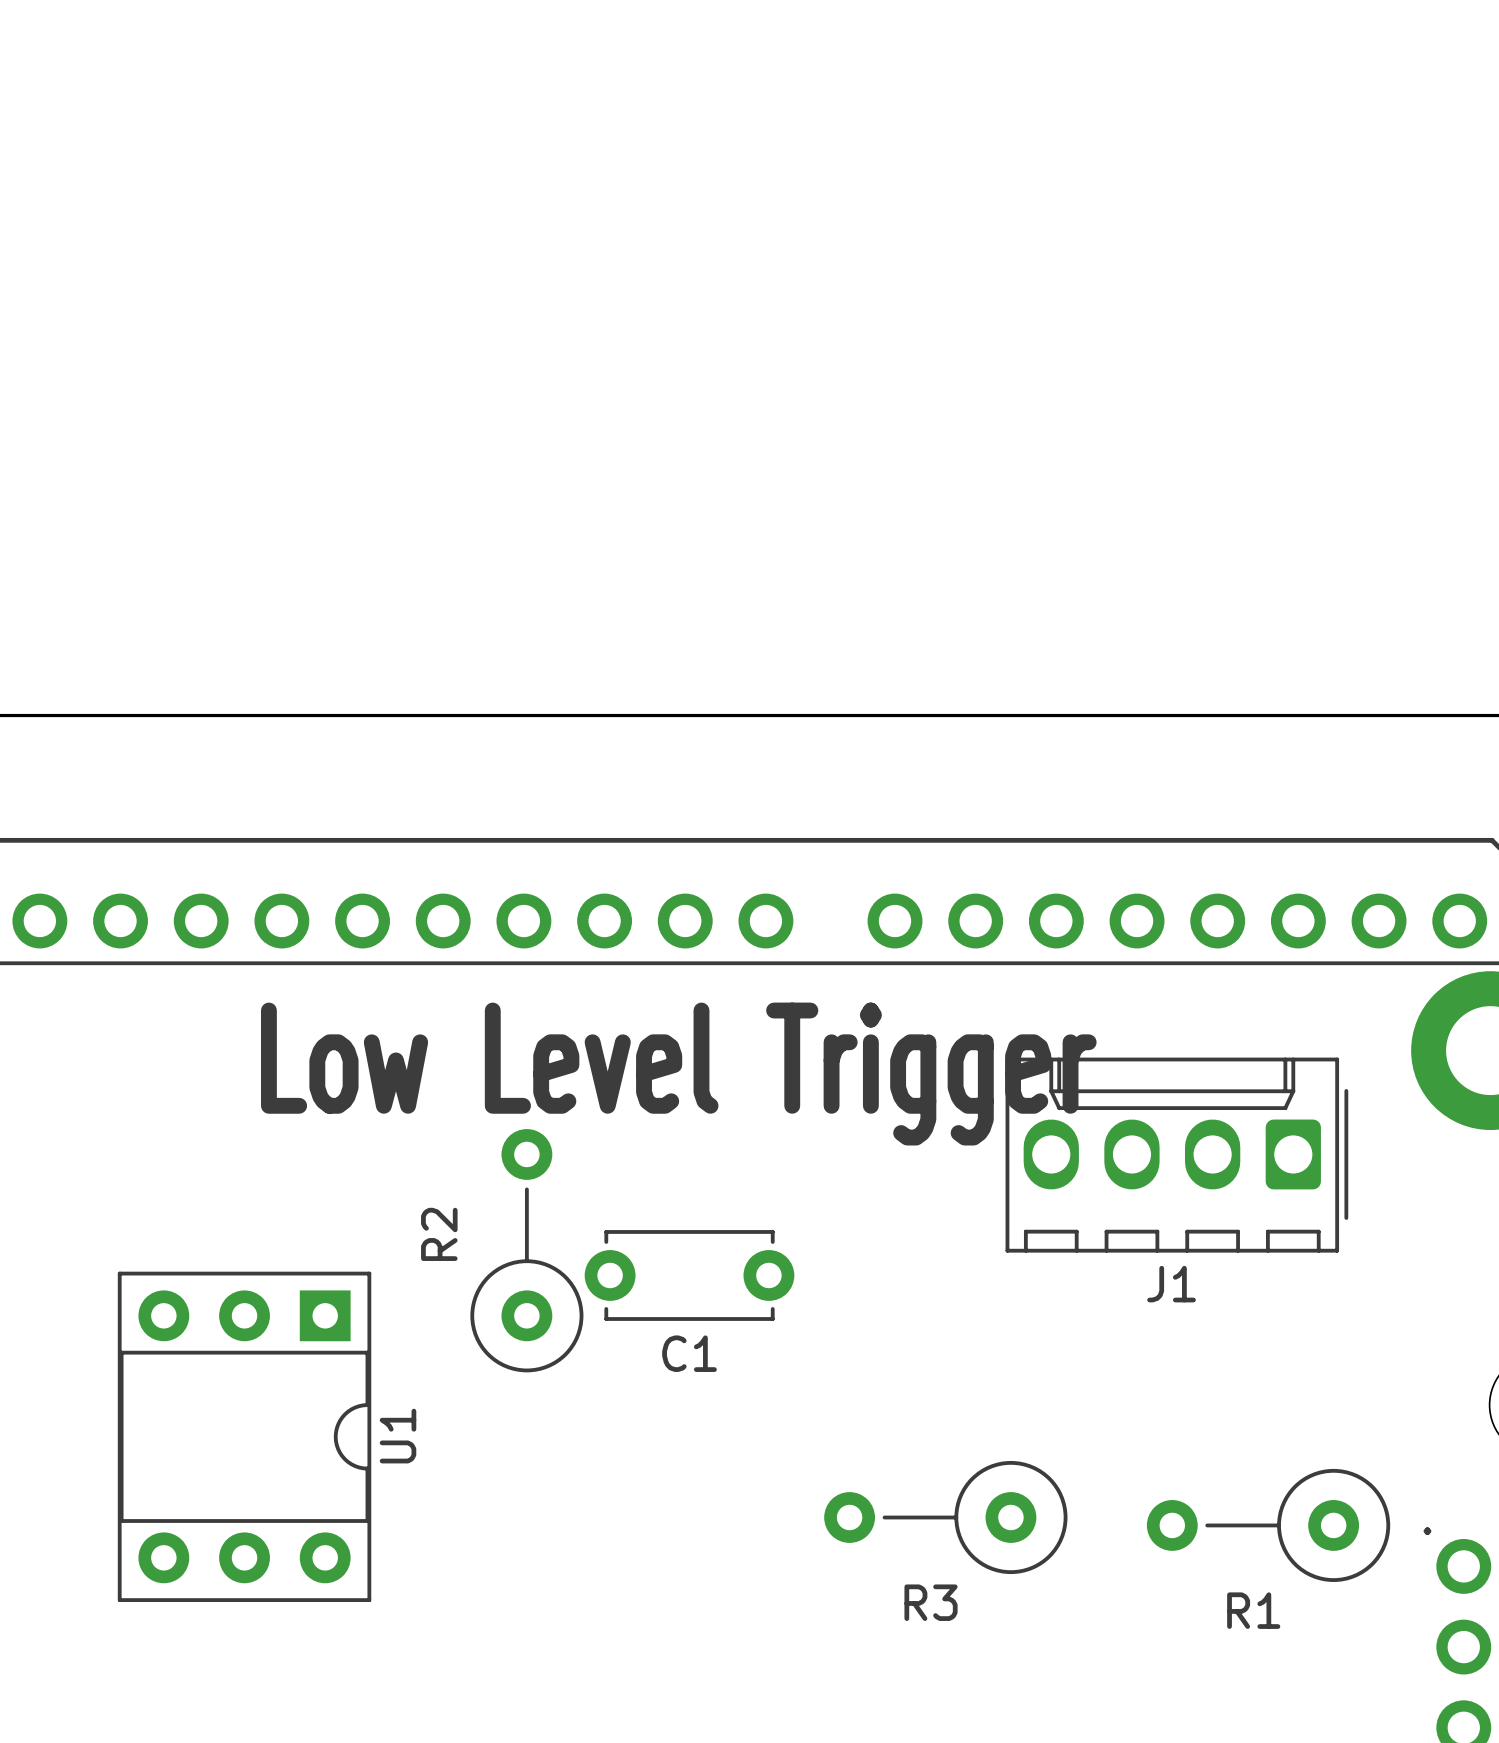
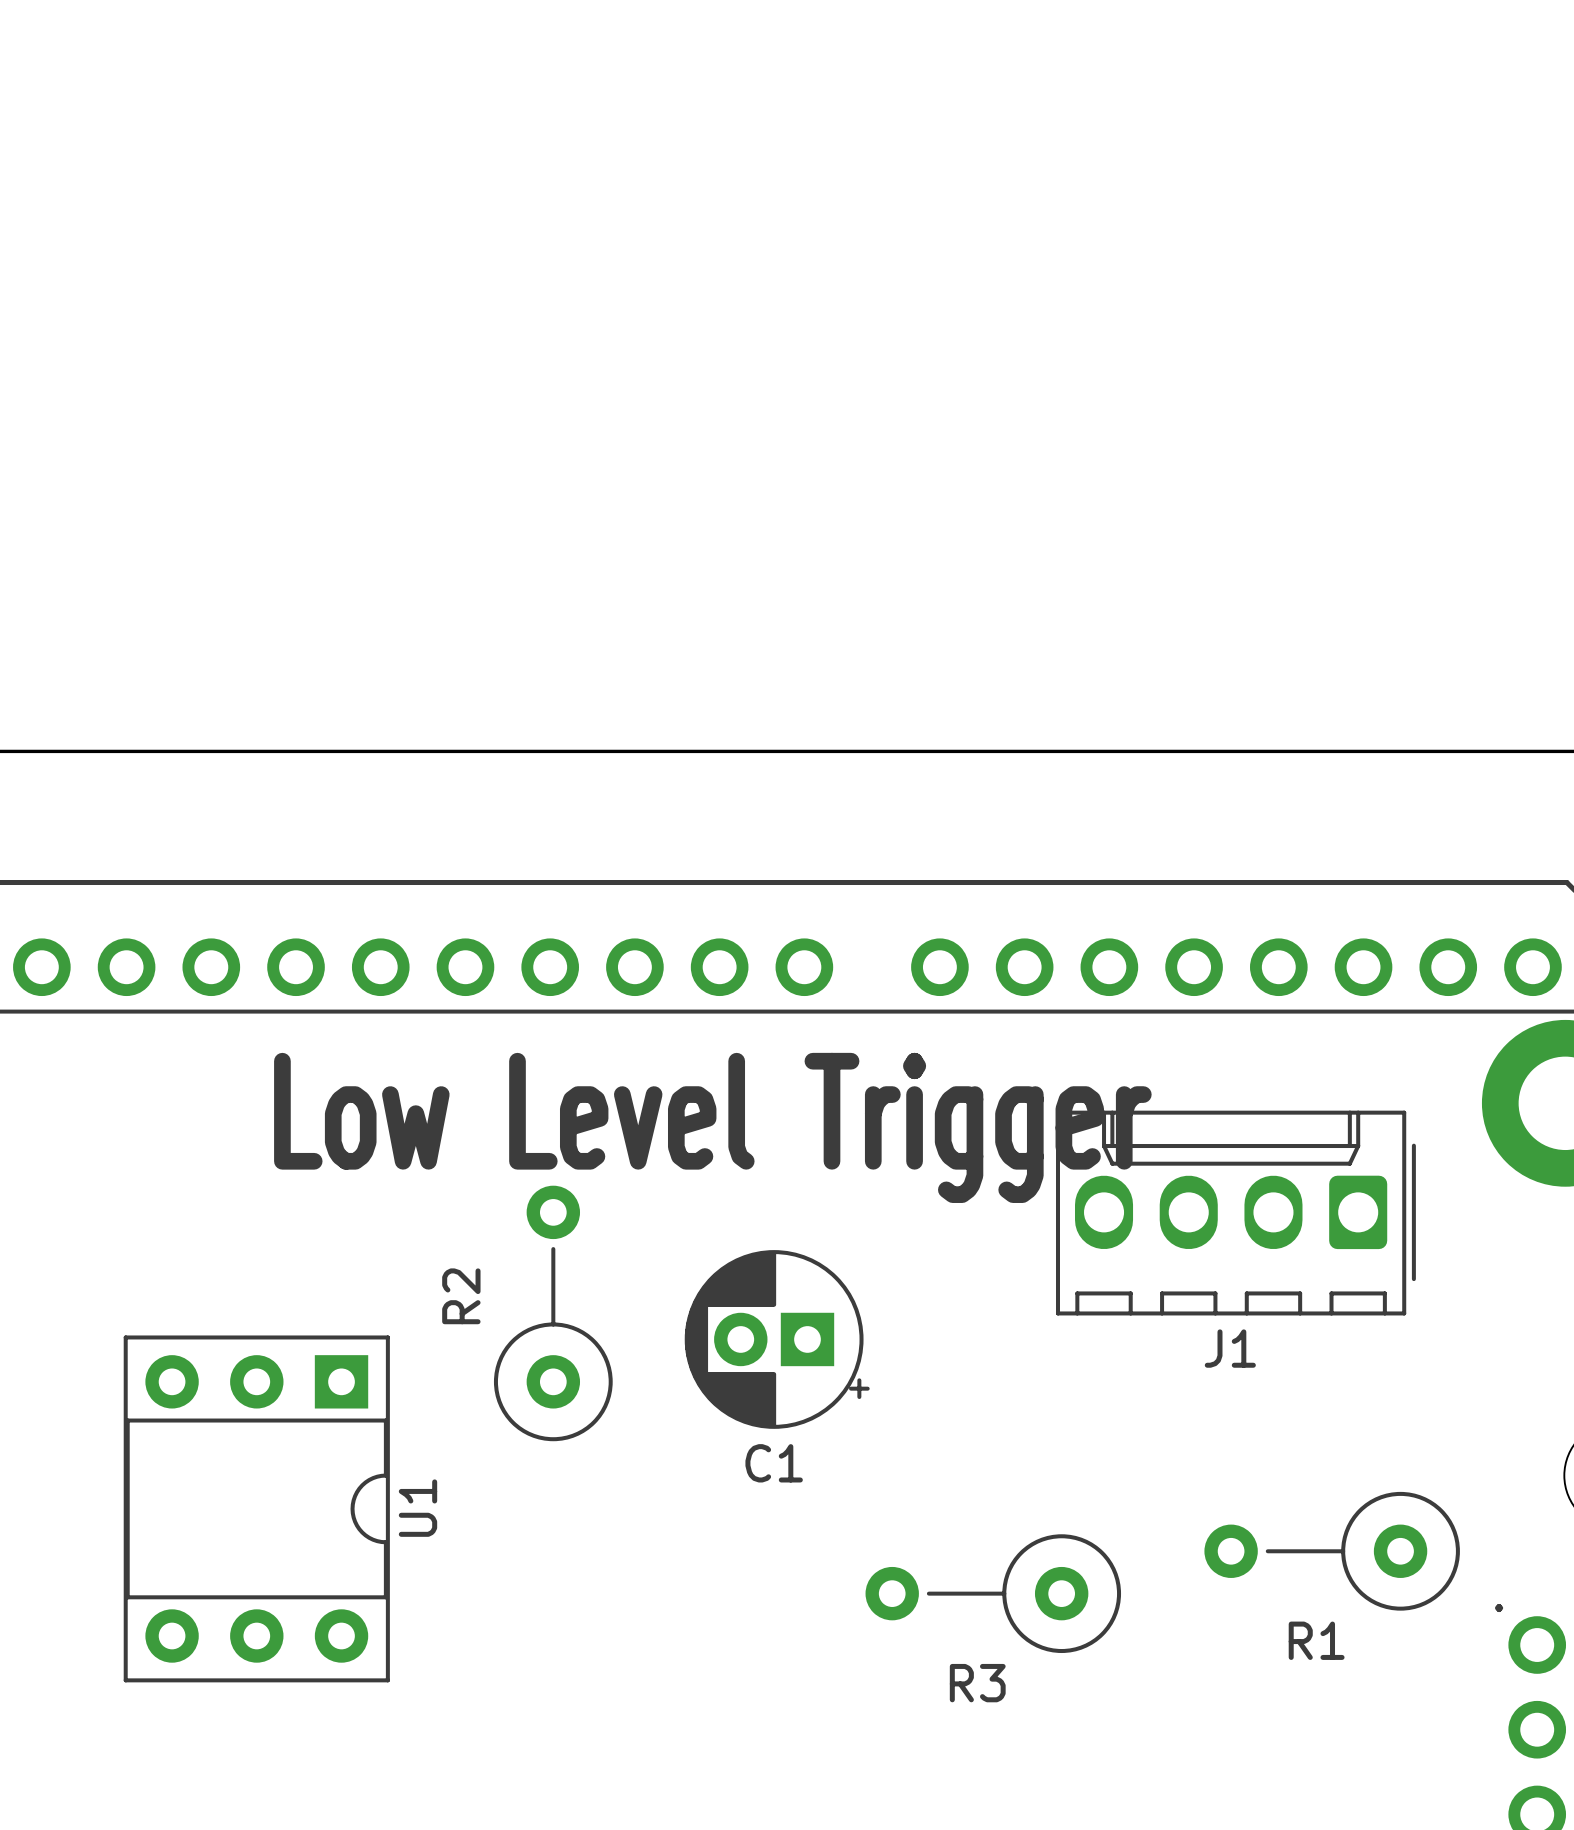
C1 footprint: [584, 1230, 795, 1321] -> [684, 1250, 870, 1429]
R1 position: (1268, 1525) -> (1332, 1551)

